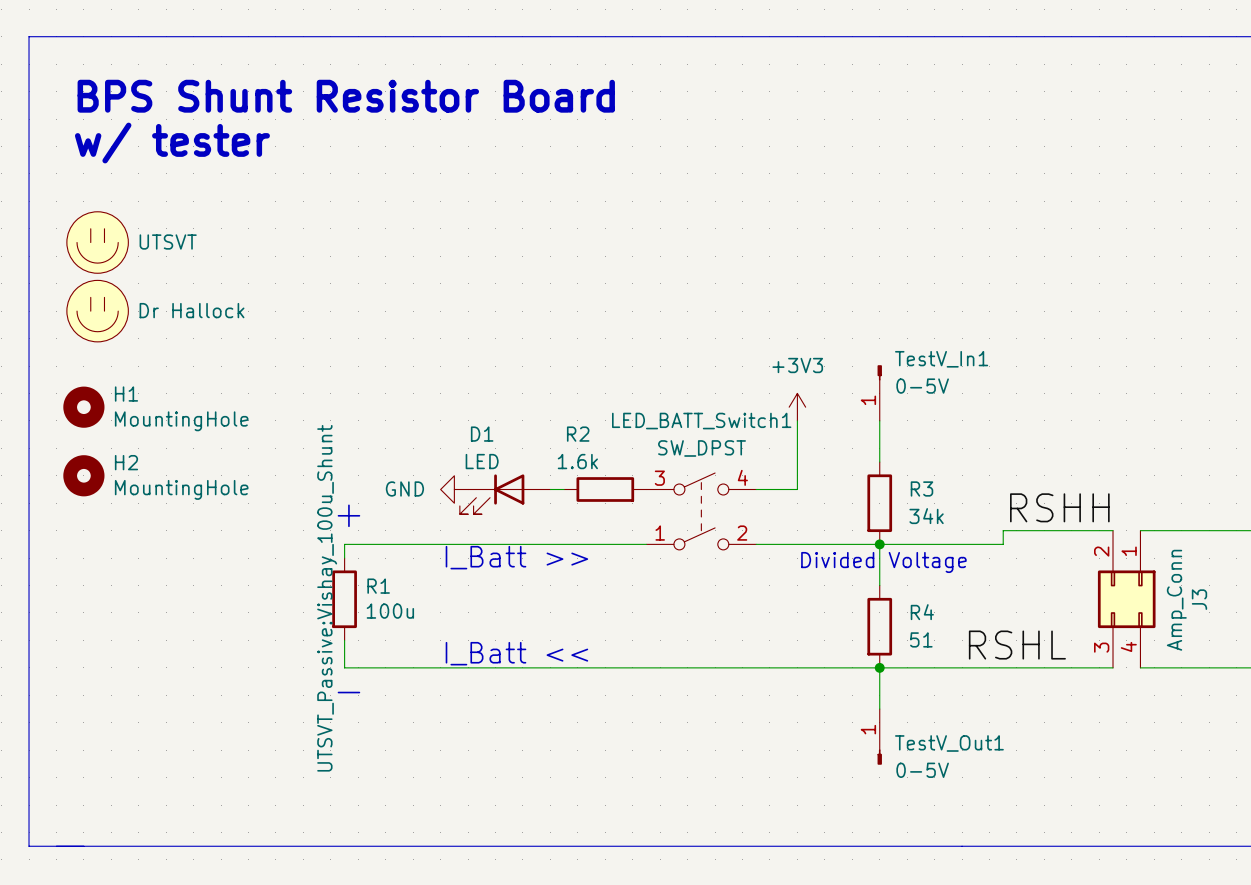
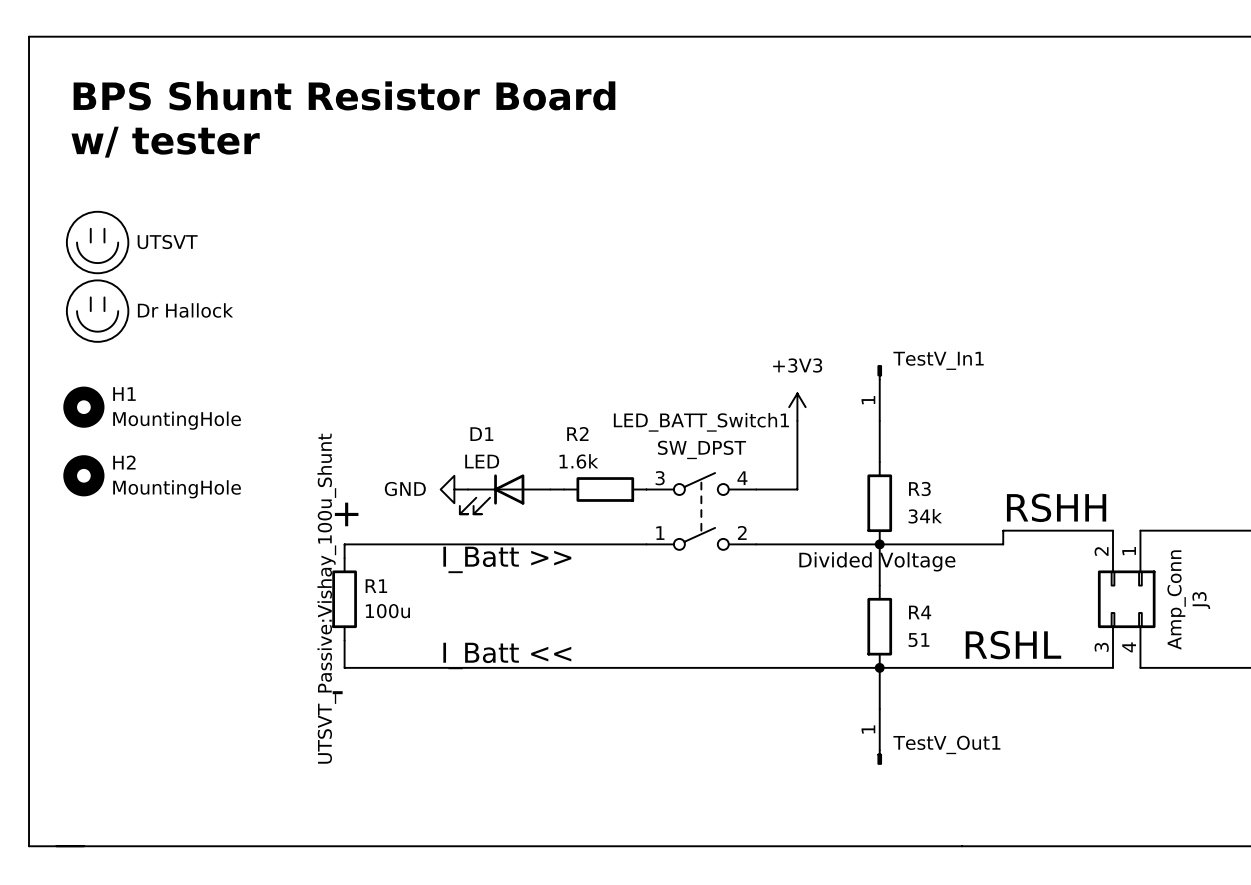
TestV_In1 value: 0-5V (922, 386) -> none
TestV_Out1 value: 0-5V (922, 770) -> none

